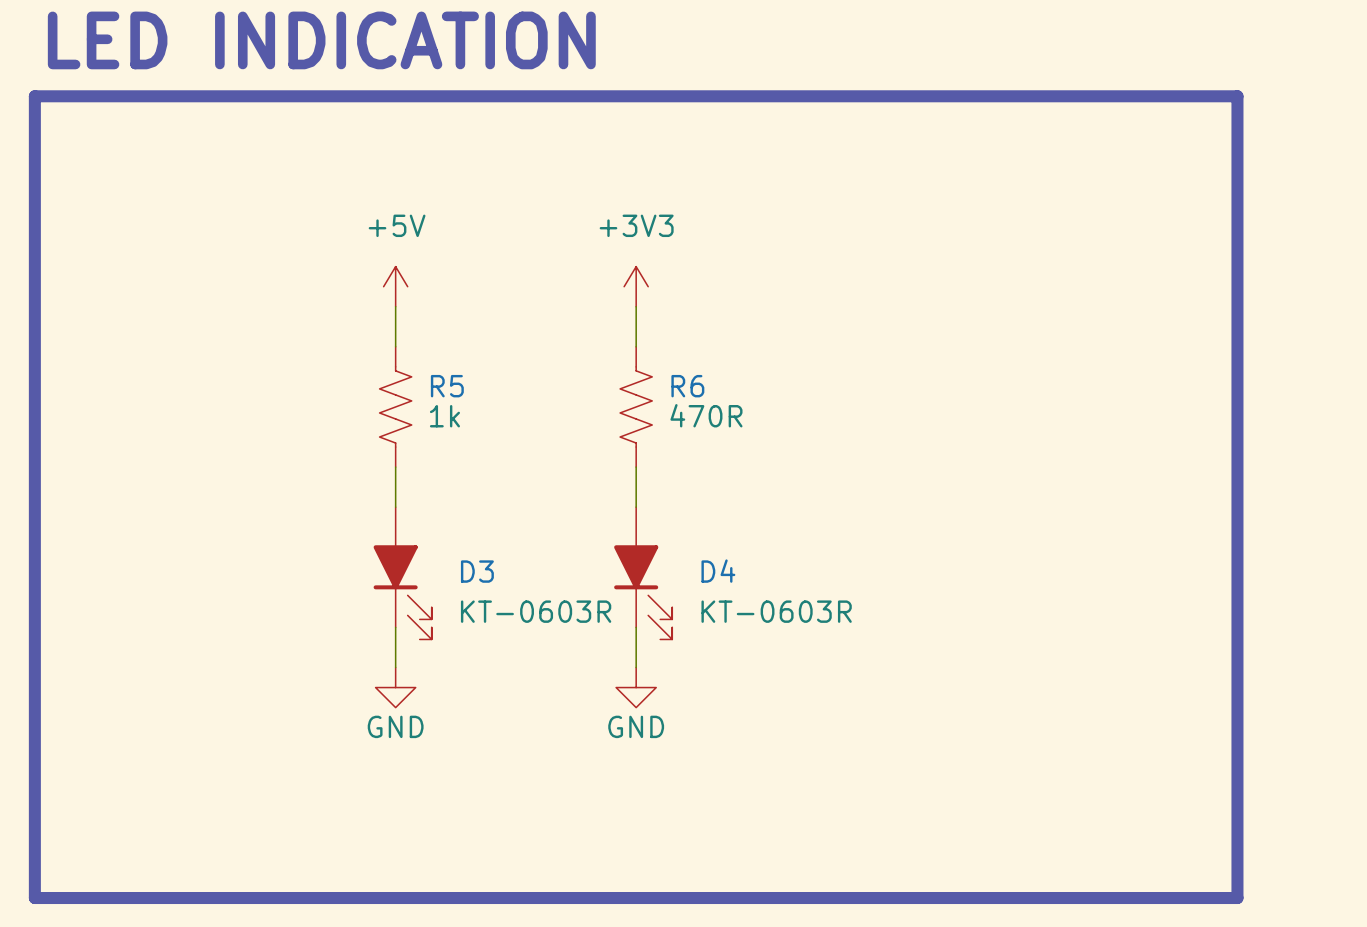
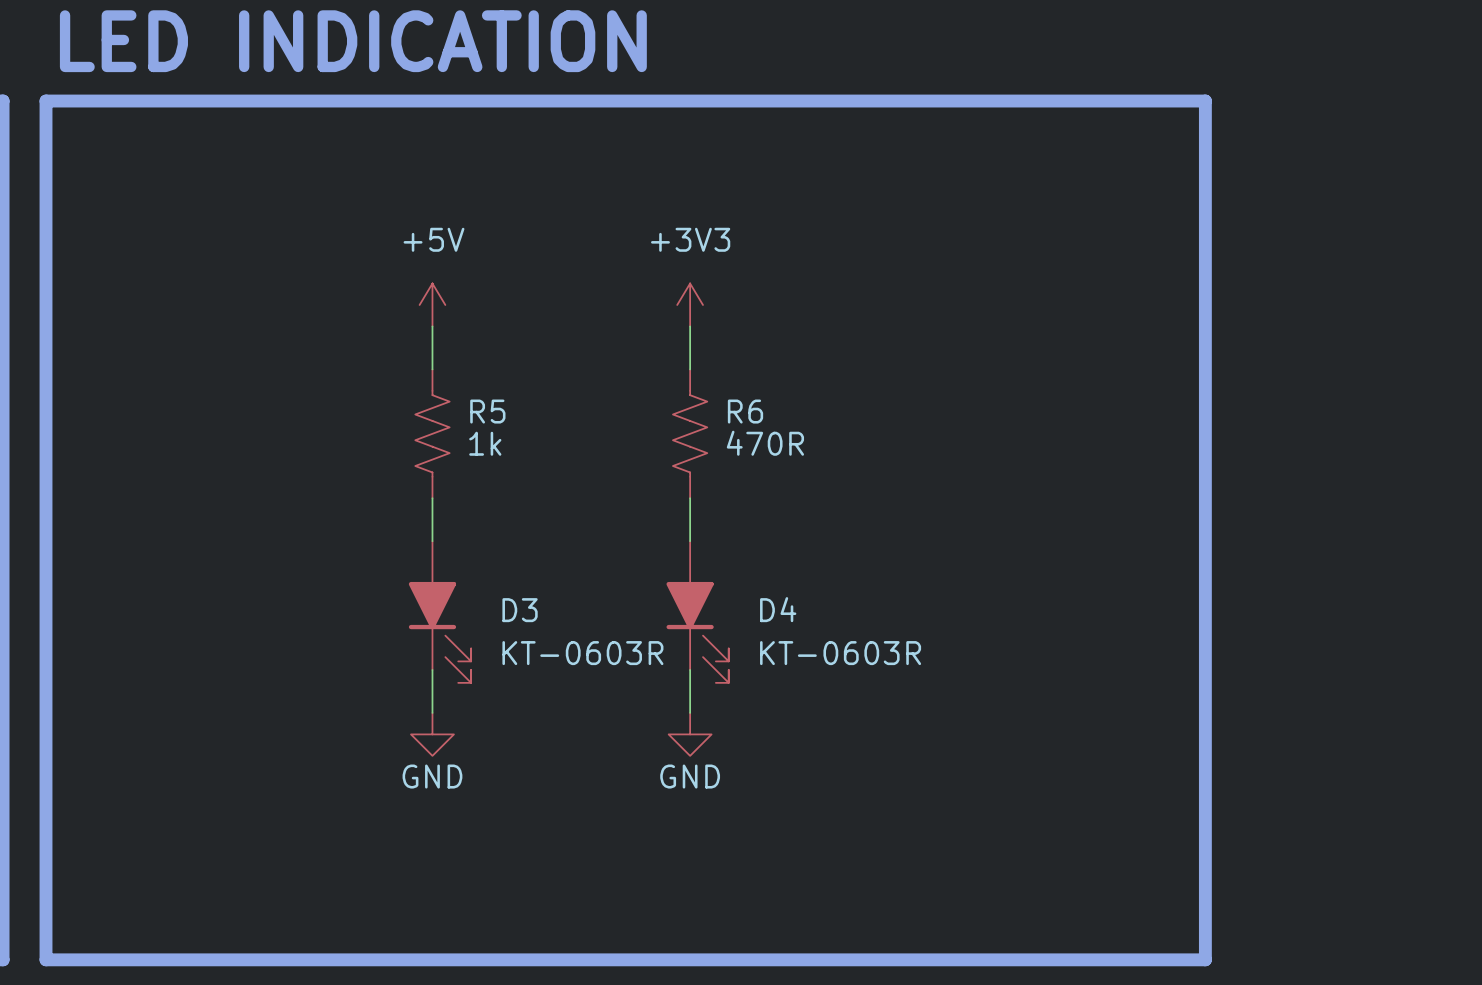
line: (1117, 96) (1237, 96) (1237, 898) (1117, 898) -> (1205, 101) (1205, 959)

